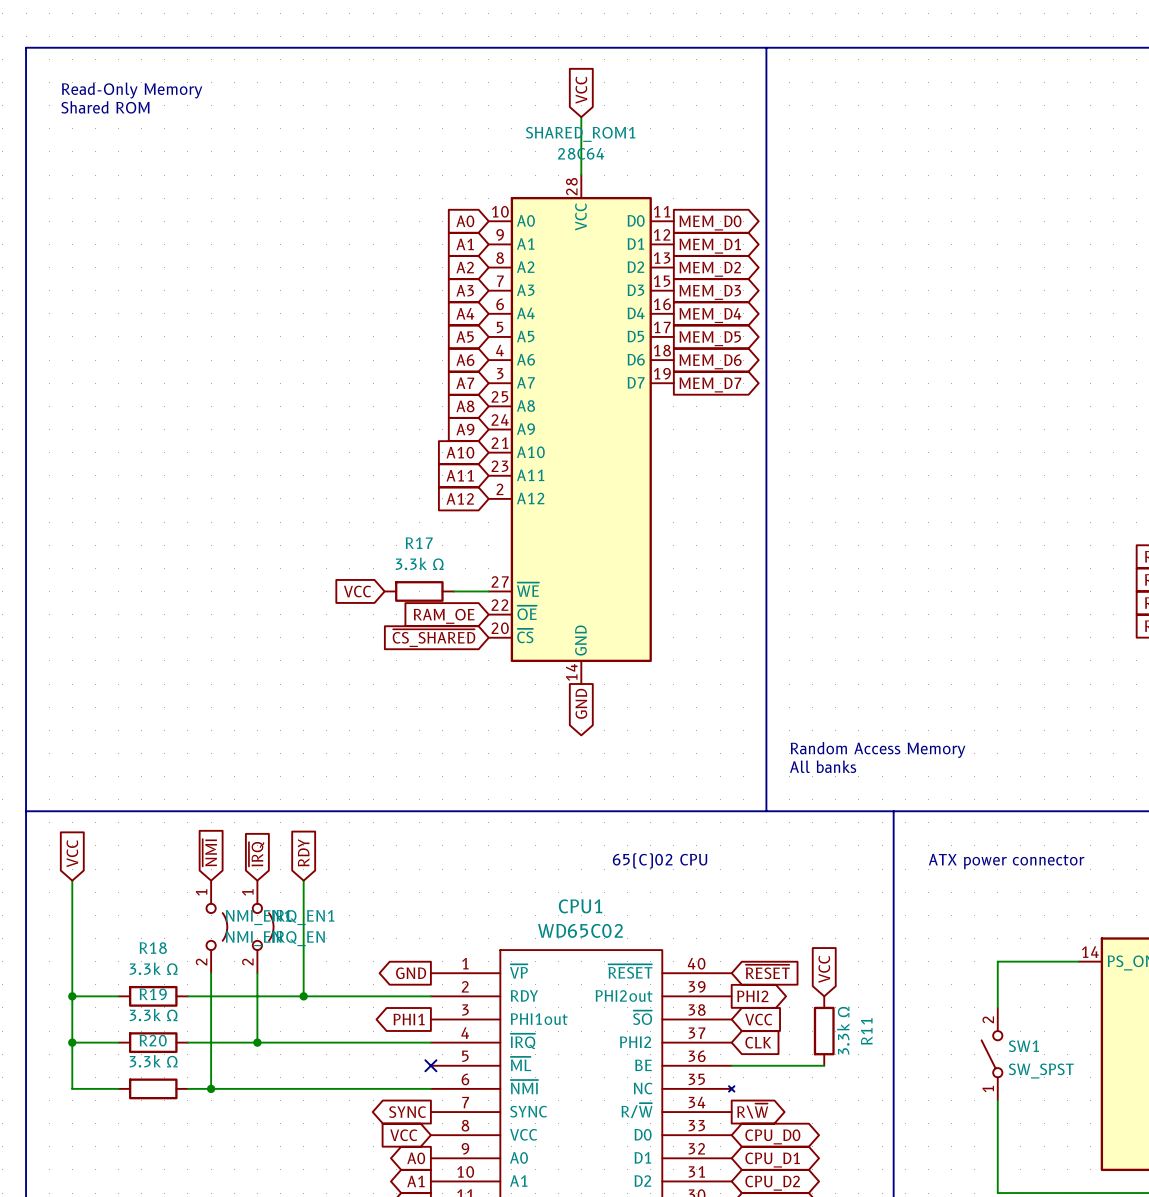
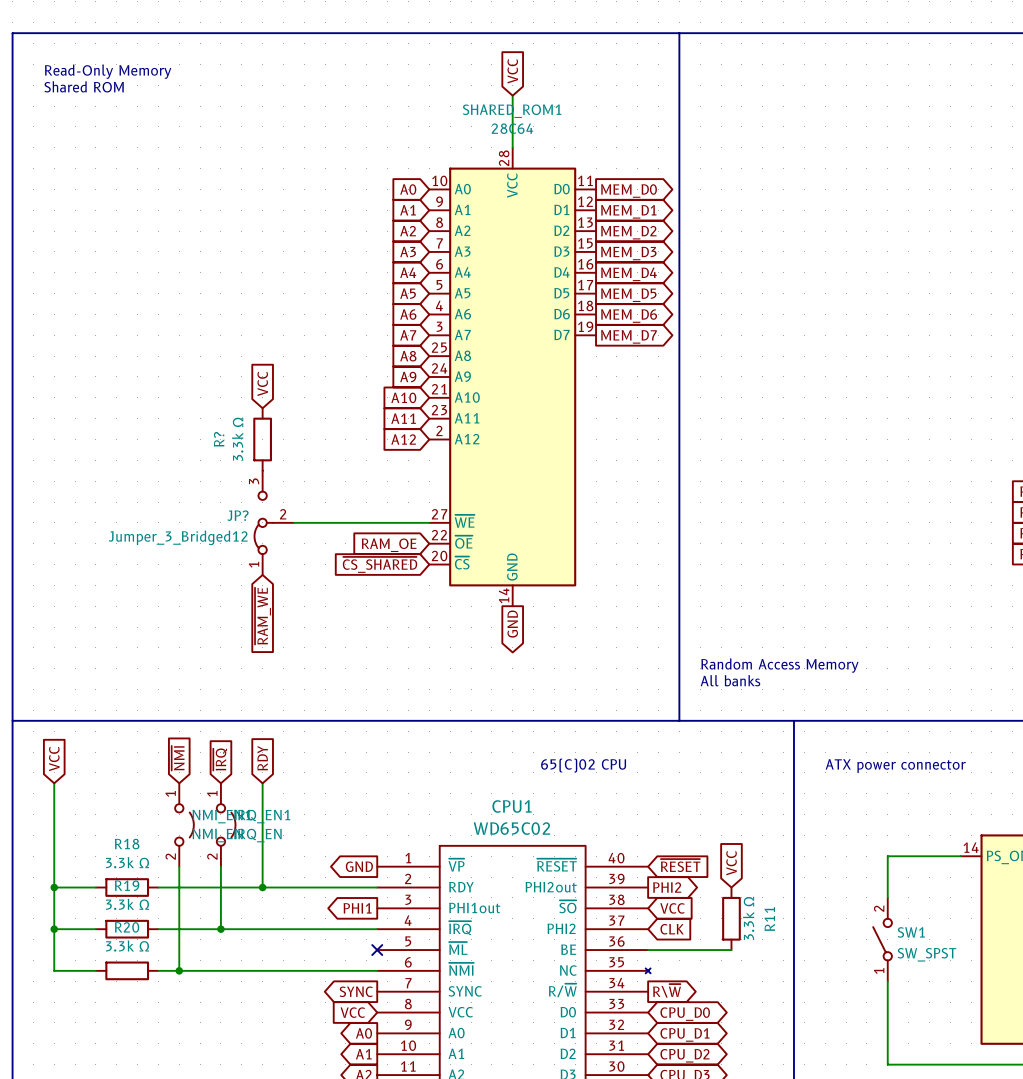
R?: none -> 3.3k Ω (262, 439)
JP?: none -> Jumper_3_Bridged12 (274, 522)
wire: none -> (293, 522) (398, 522)
global label rotation: 0° (357, 591) -> 90° clockwise (262, 383)
global label position: VCC (357, 591) -> VCC (262, 383)
R17: 3.3k Ω (419, 591) -> none
global label: none -> ~{RAM_WE} (262, 616)

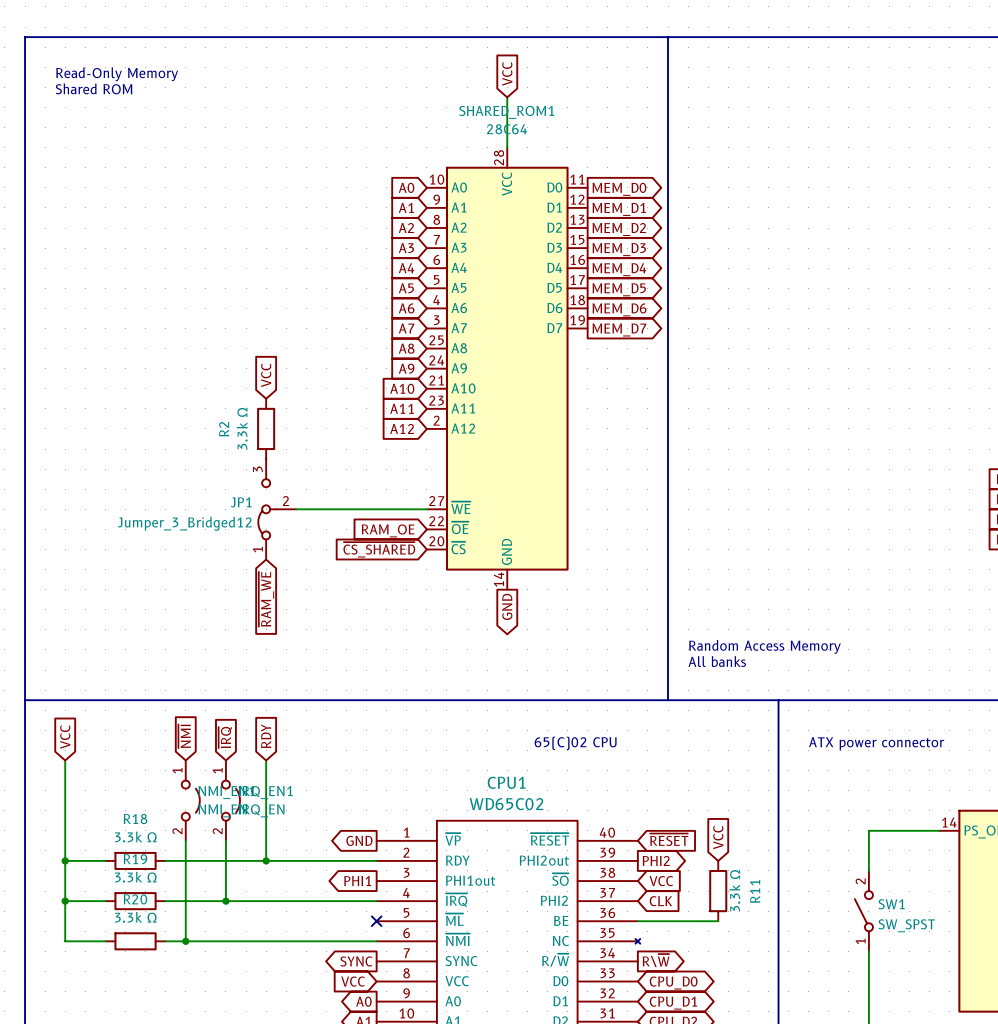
R? name: R? (219, 439) -> R2 (224, 429)
JP? name: JP? (237, 515) -> JP1 (241, 502)

